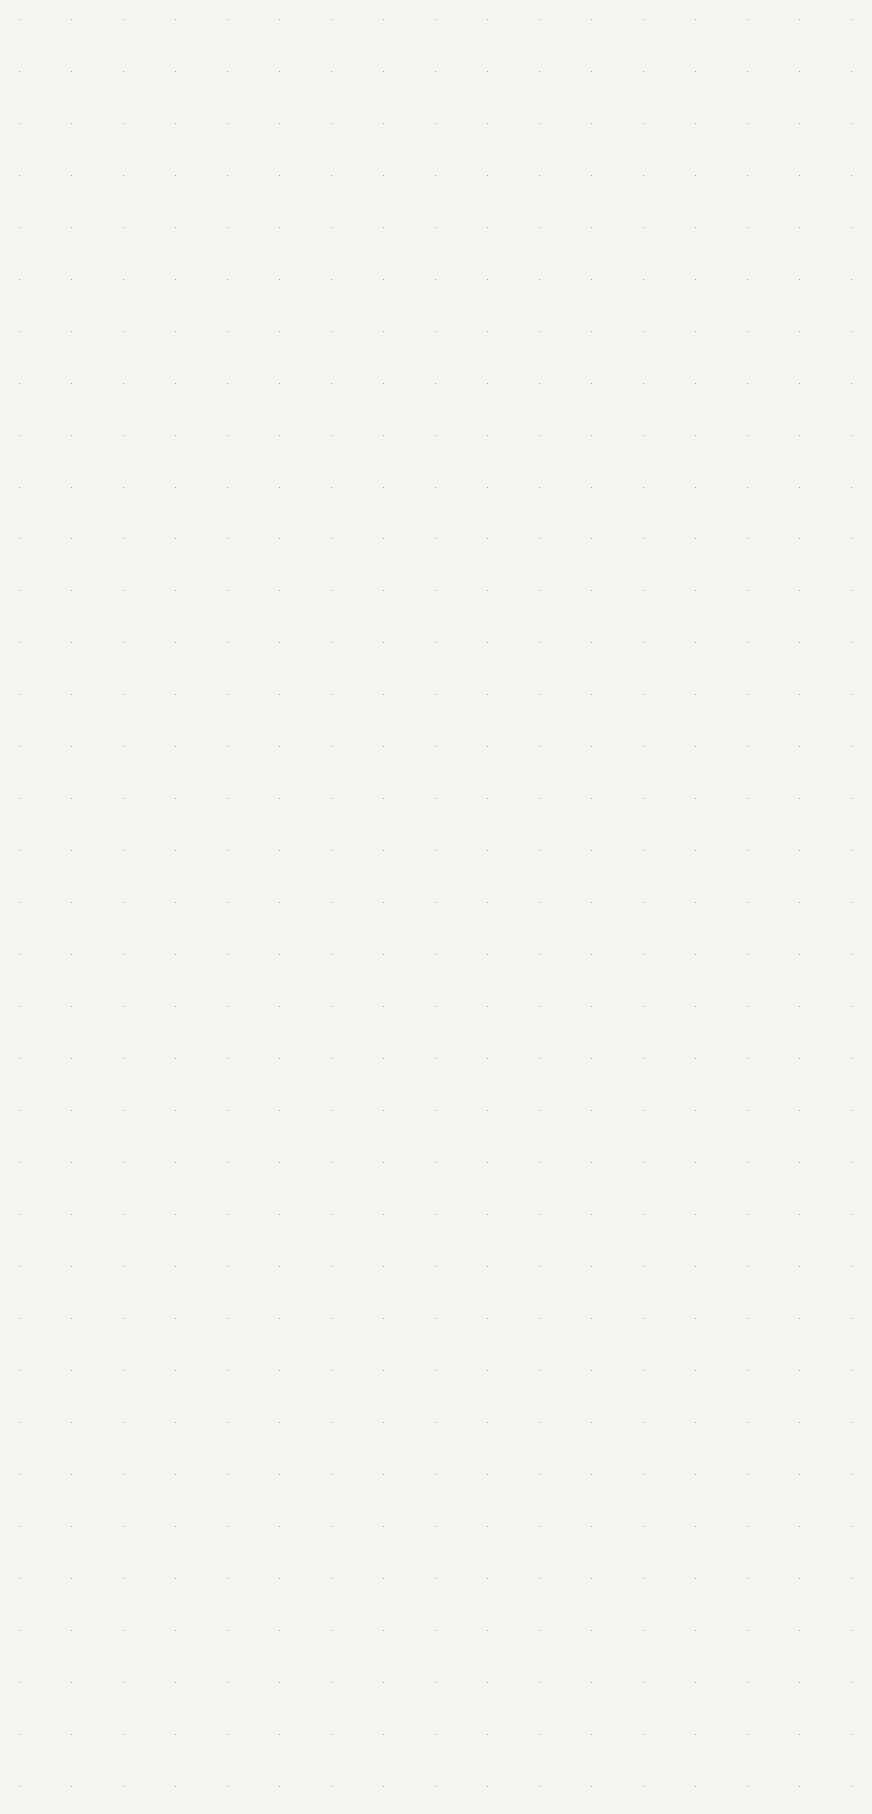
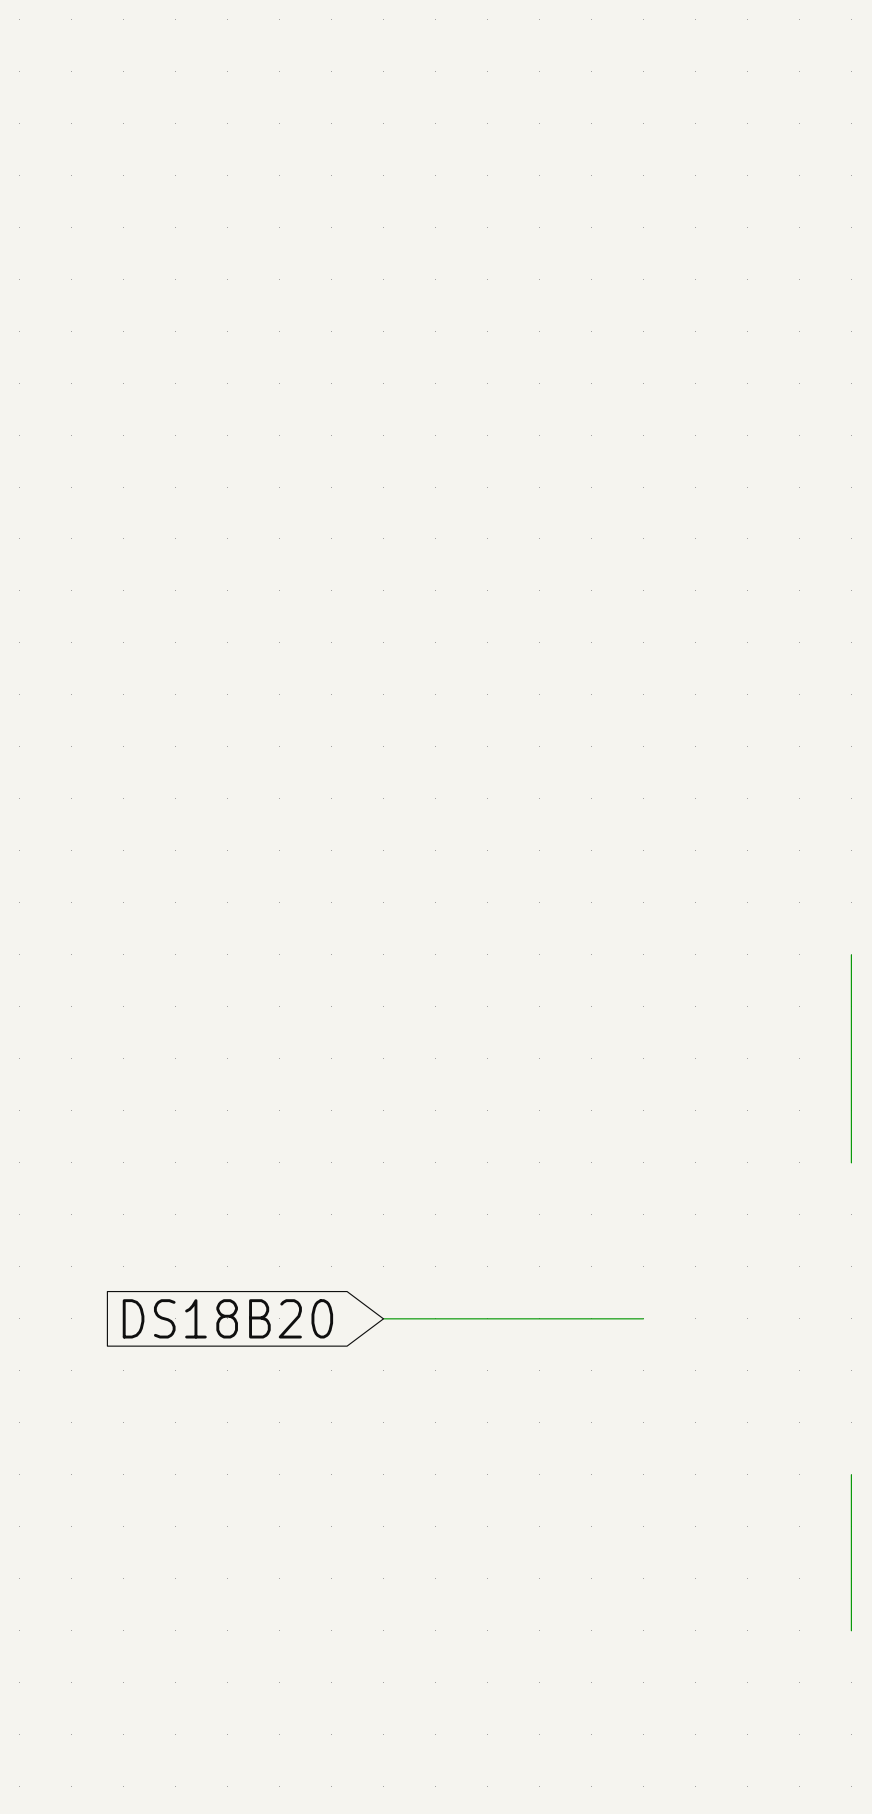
wire: none -> (851, 954) (851, 1162)
global label: none -> DS18B20 (227, 1318)
wire: none -> (383, 1318) (643, 1318)
wire: none -> (851, 1474) (851, 1630)

